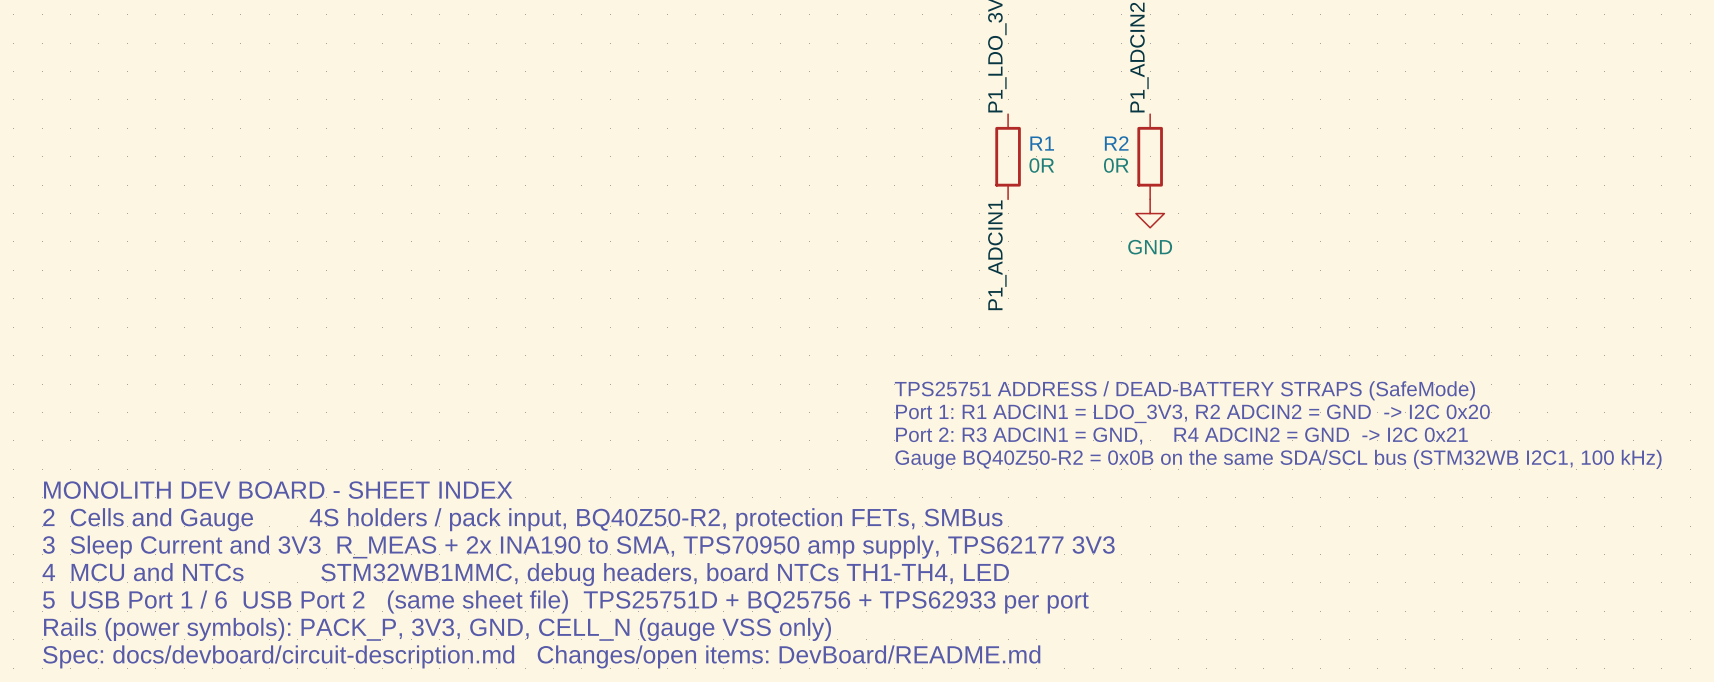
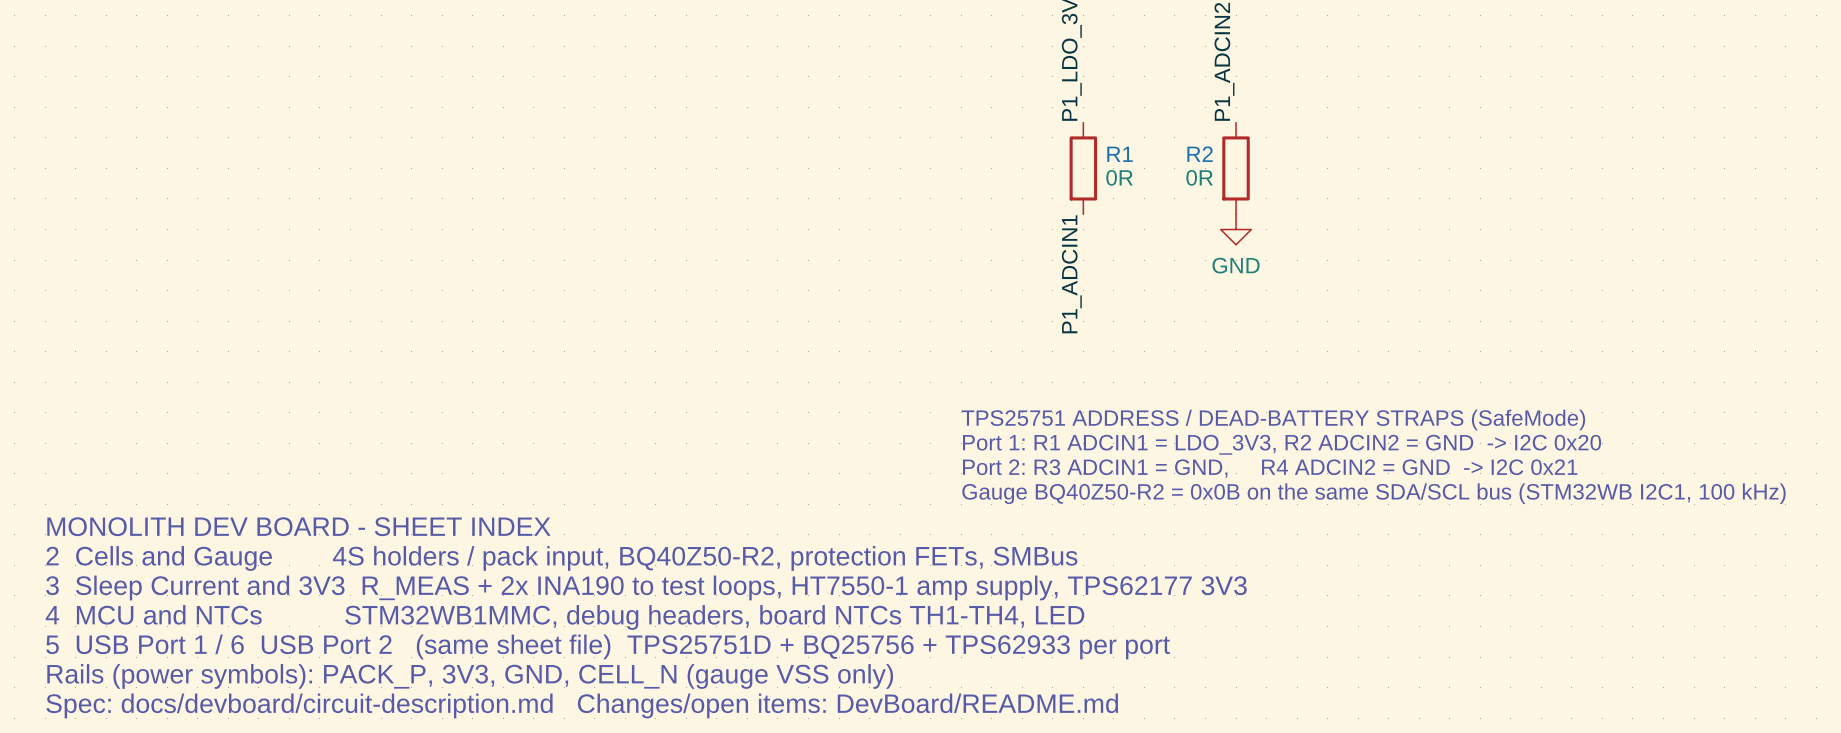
text: 3 Sleep Current and 3V3 R_MEAS + 2x INA190 to SMA, TPS70950 amp supply, TPS62177 3V3 (578, 547) -> 3 Sleep Current and 3V3 R_MEAS + 2x INA190 to test loops, HT7550-1 amp supply, TPS62177 3V3 (646, 587)

